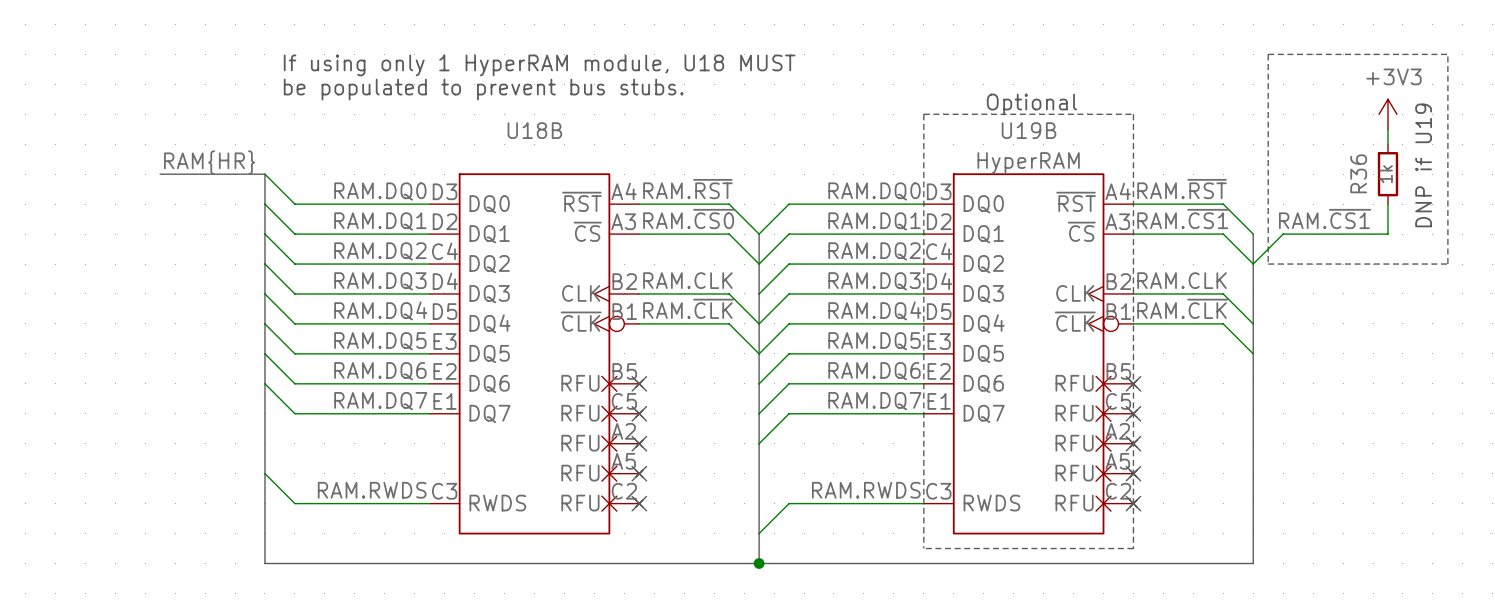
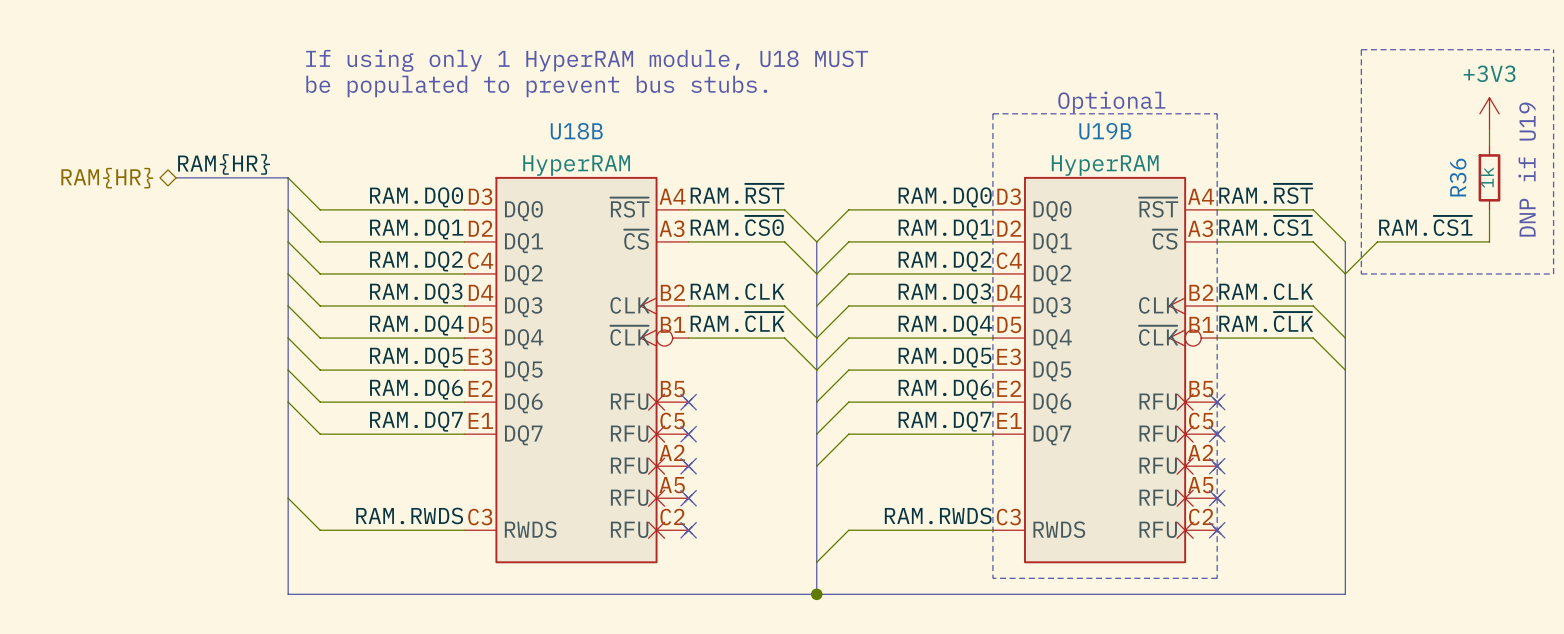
U18B value: none -> HyperRAM (576, 165)
hierarchical label: none -> RAM{HR} (107, 178)

